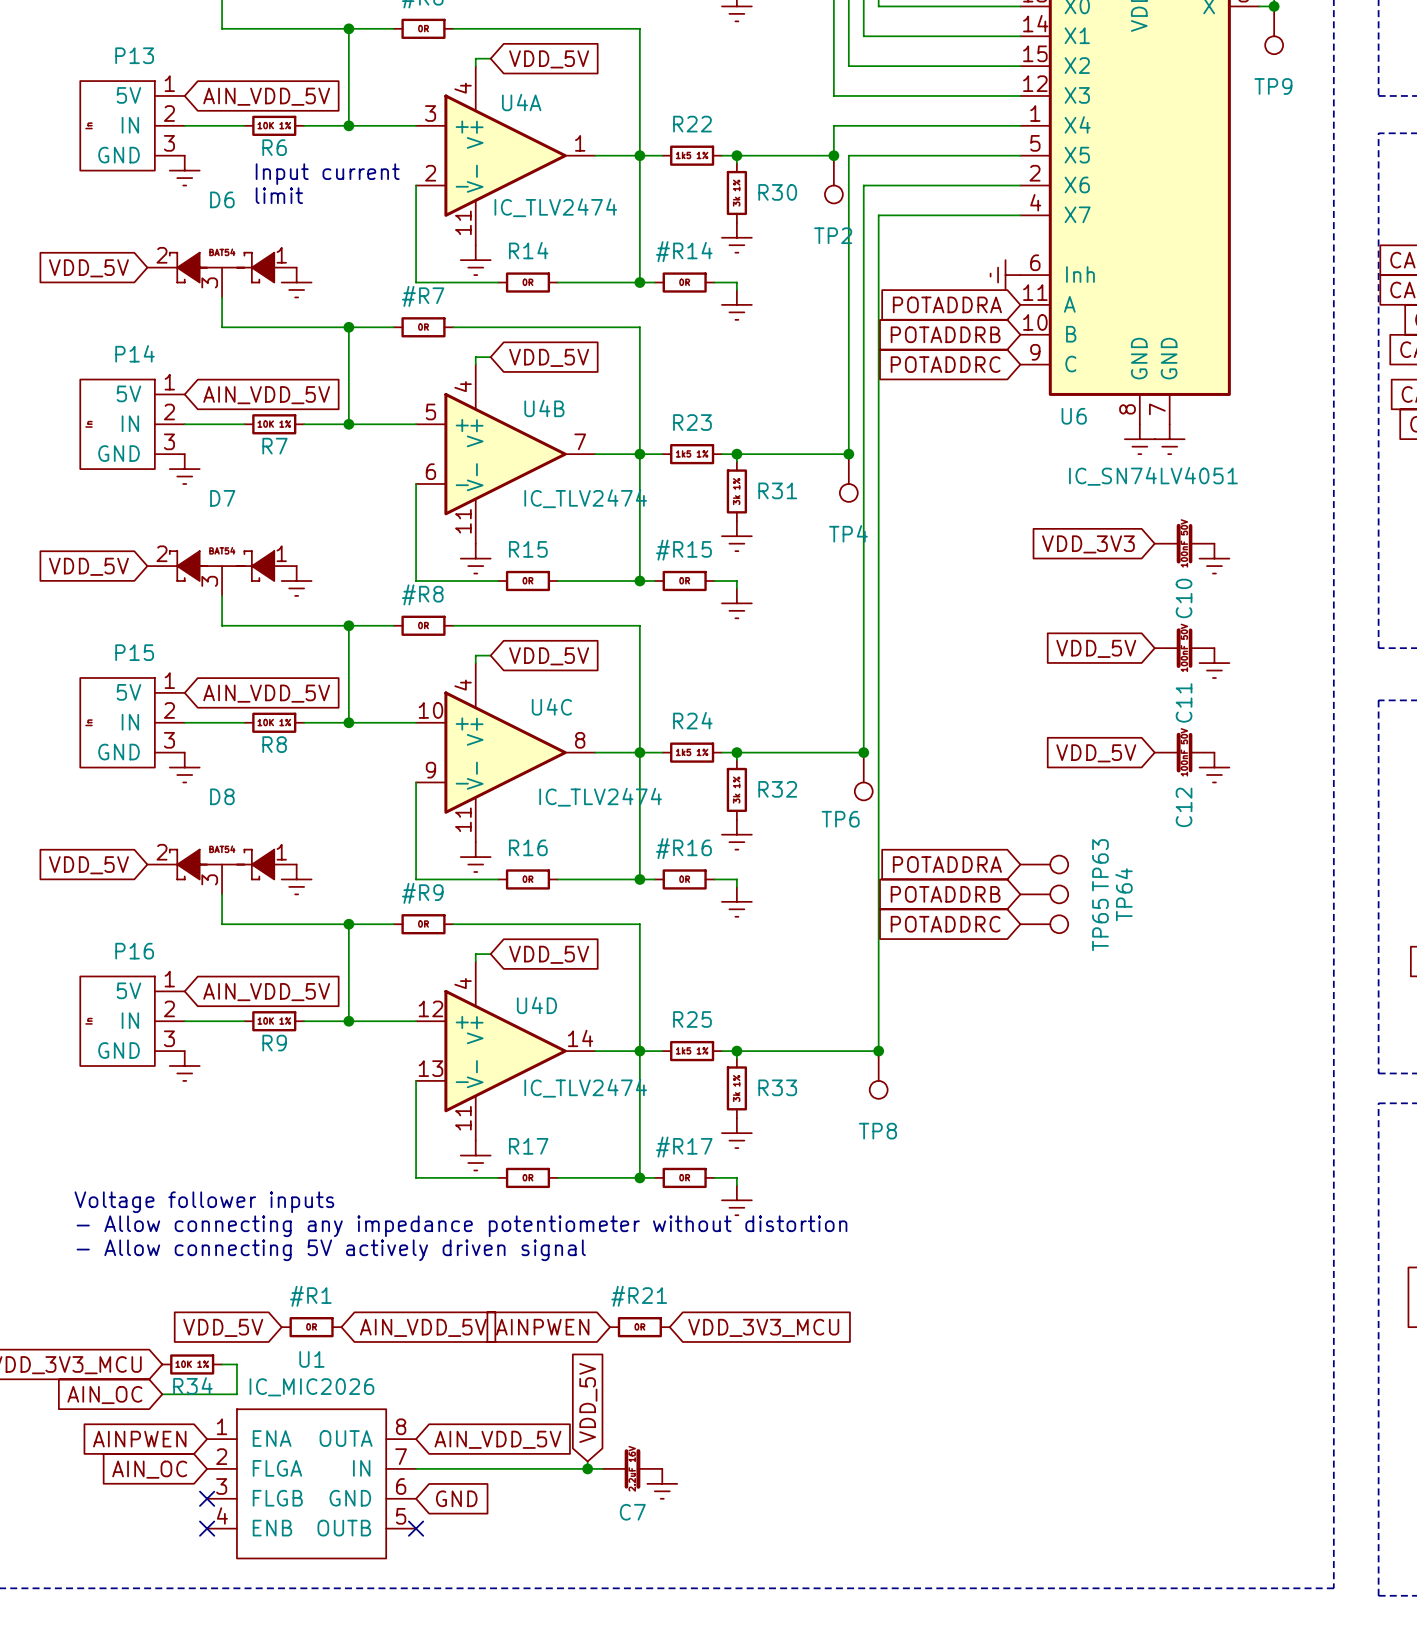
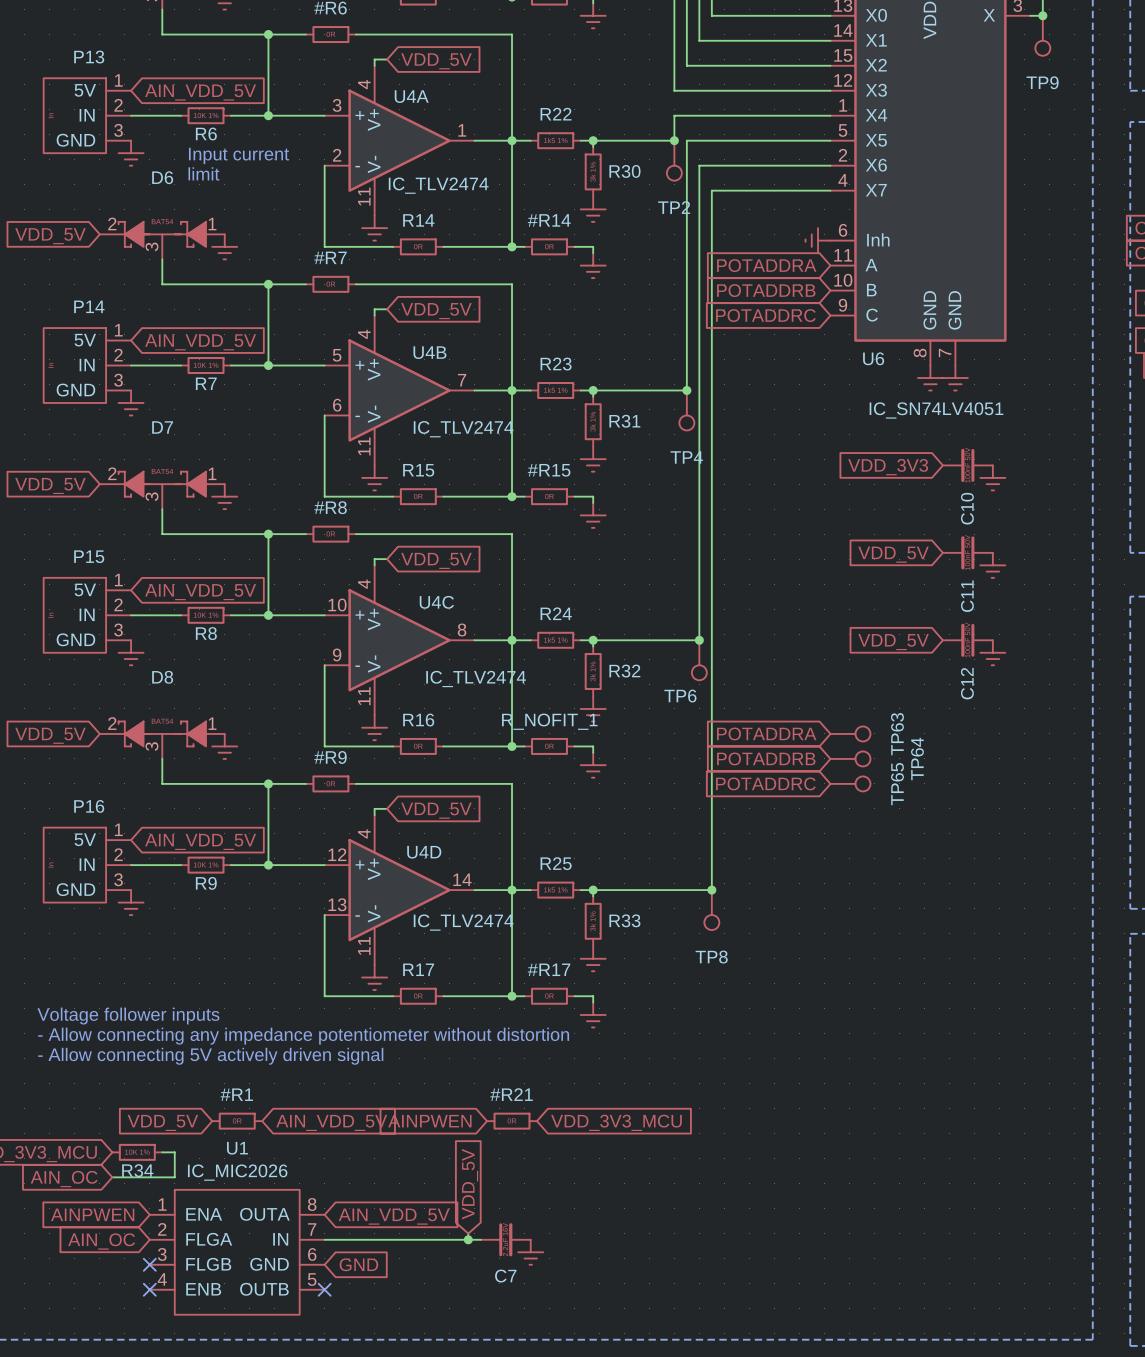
#R16: (684, 879) -> none
R_NOFIT_1: none -> (549, 746)

